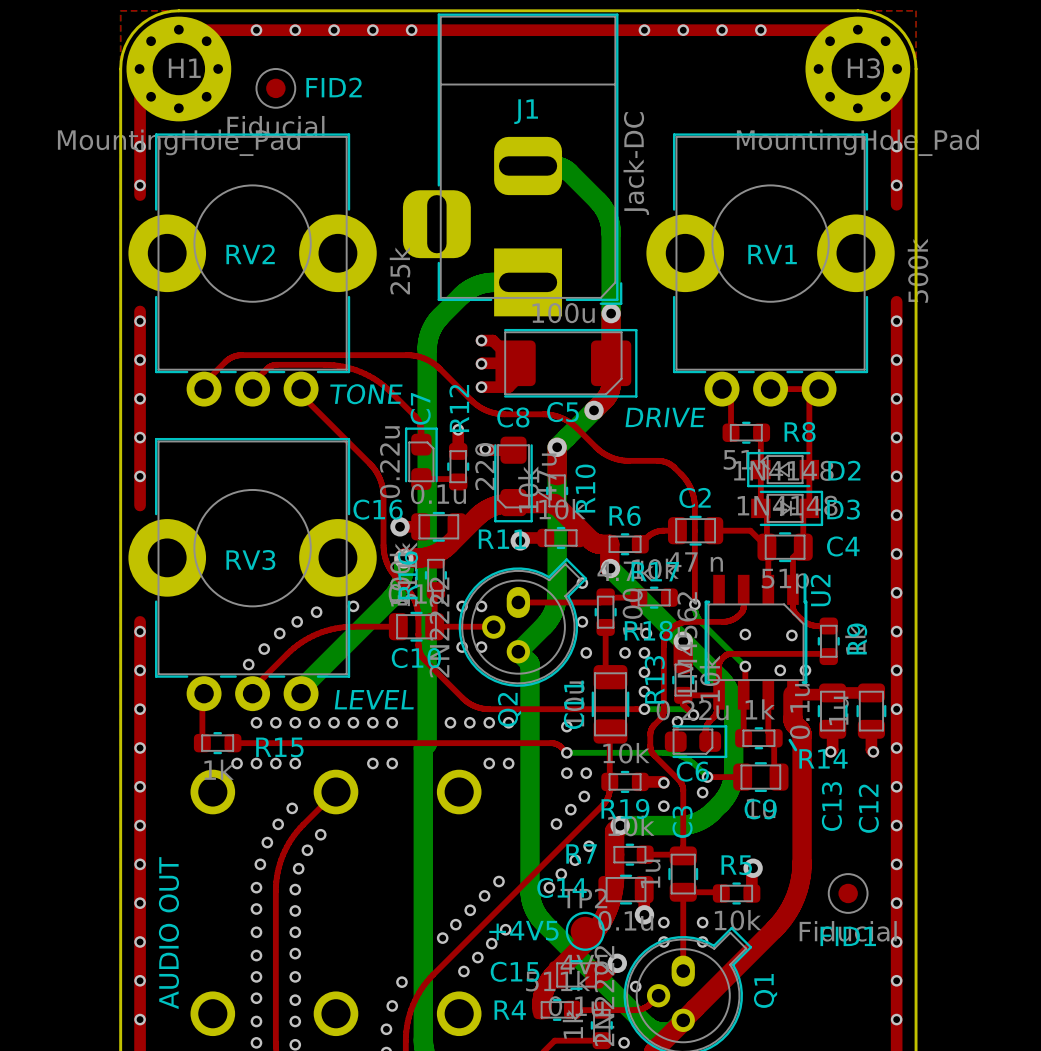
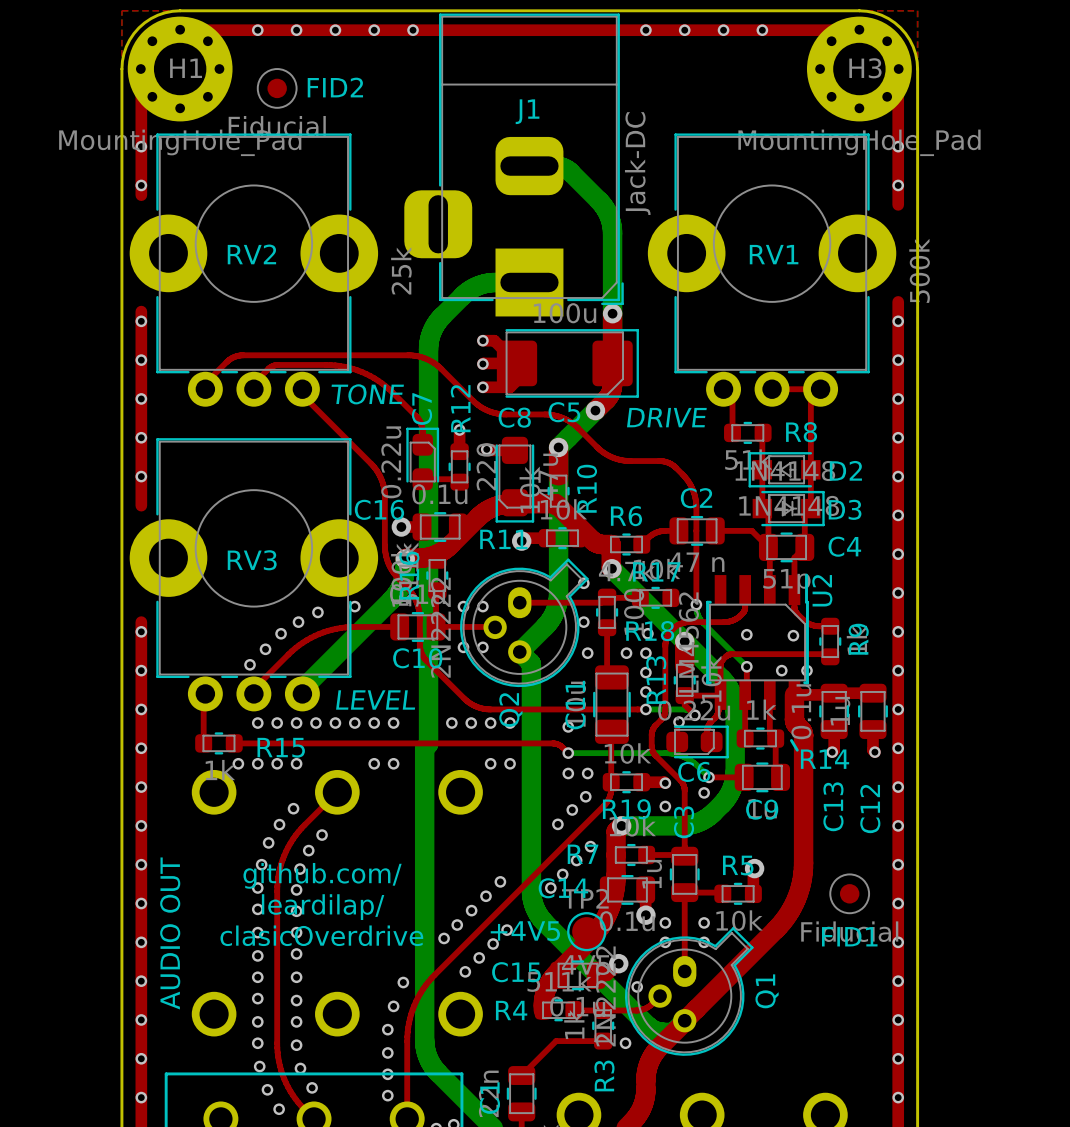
text: none -> github.com/ (322, 875)
text: none -> leardilap/ (323, 907)
text: none -> clasicOverdrive (321, 935)

